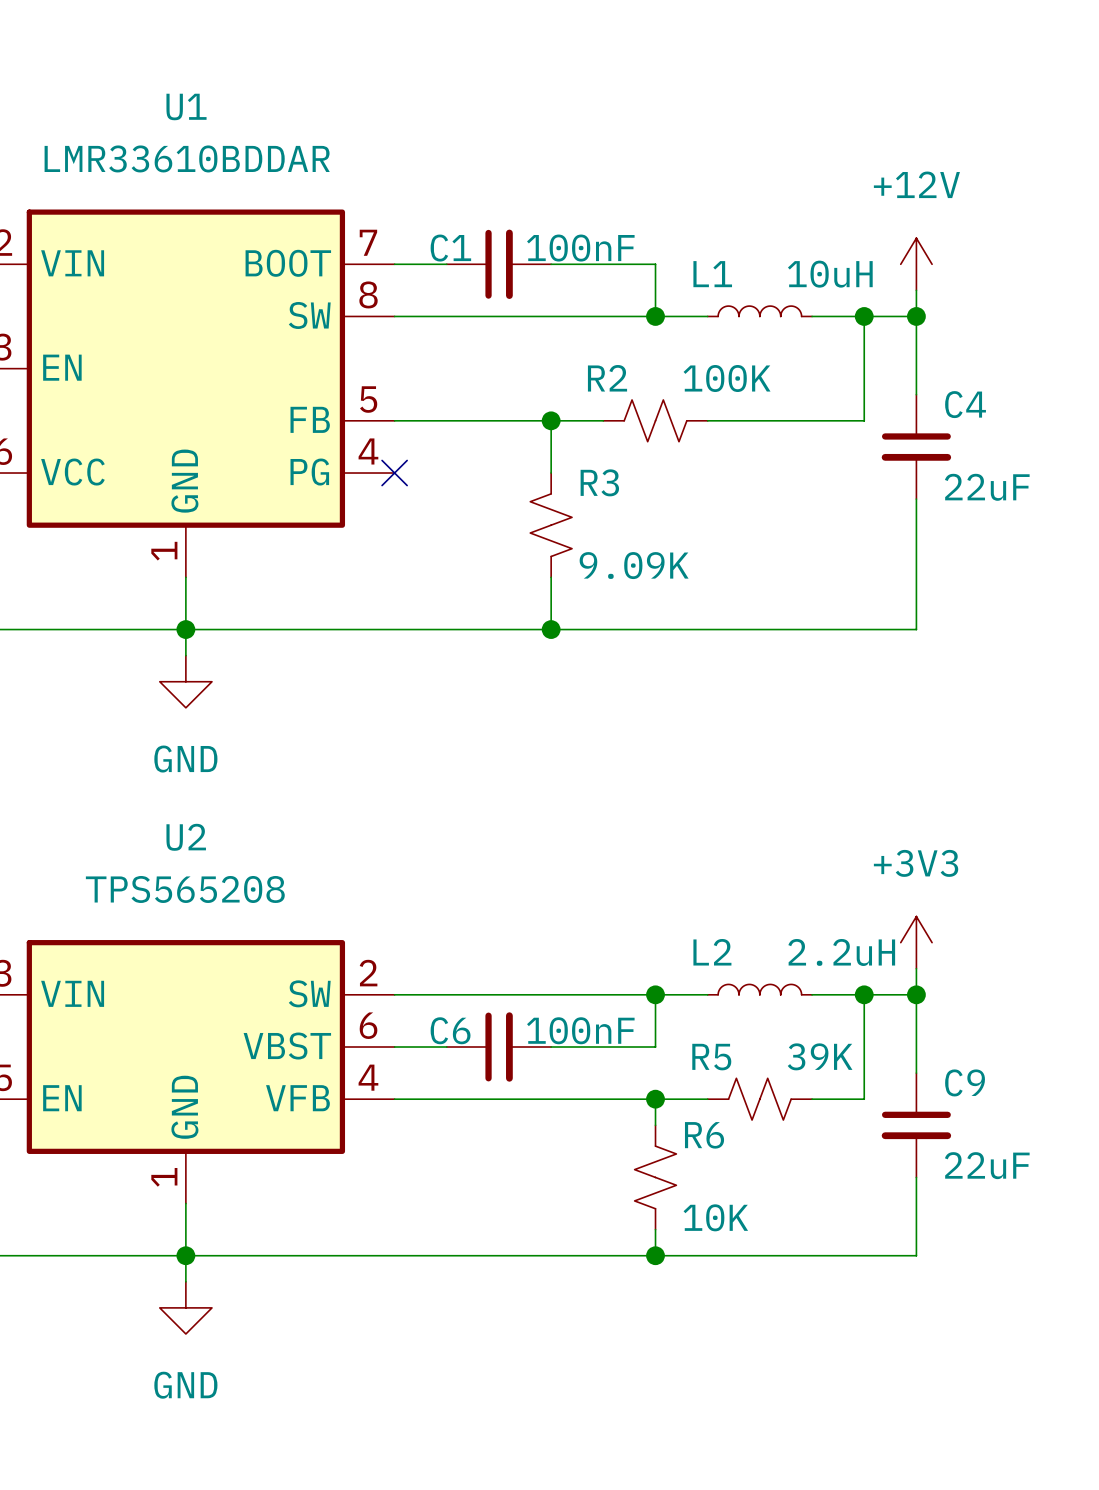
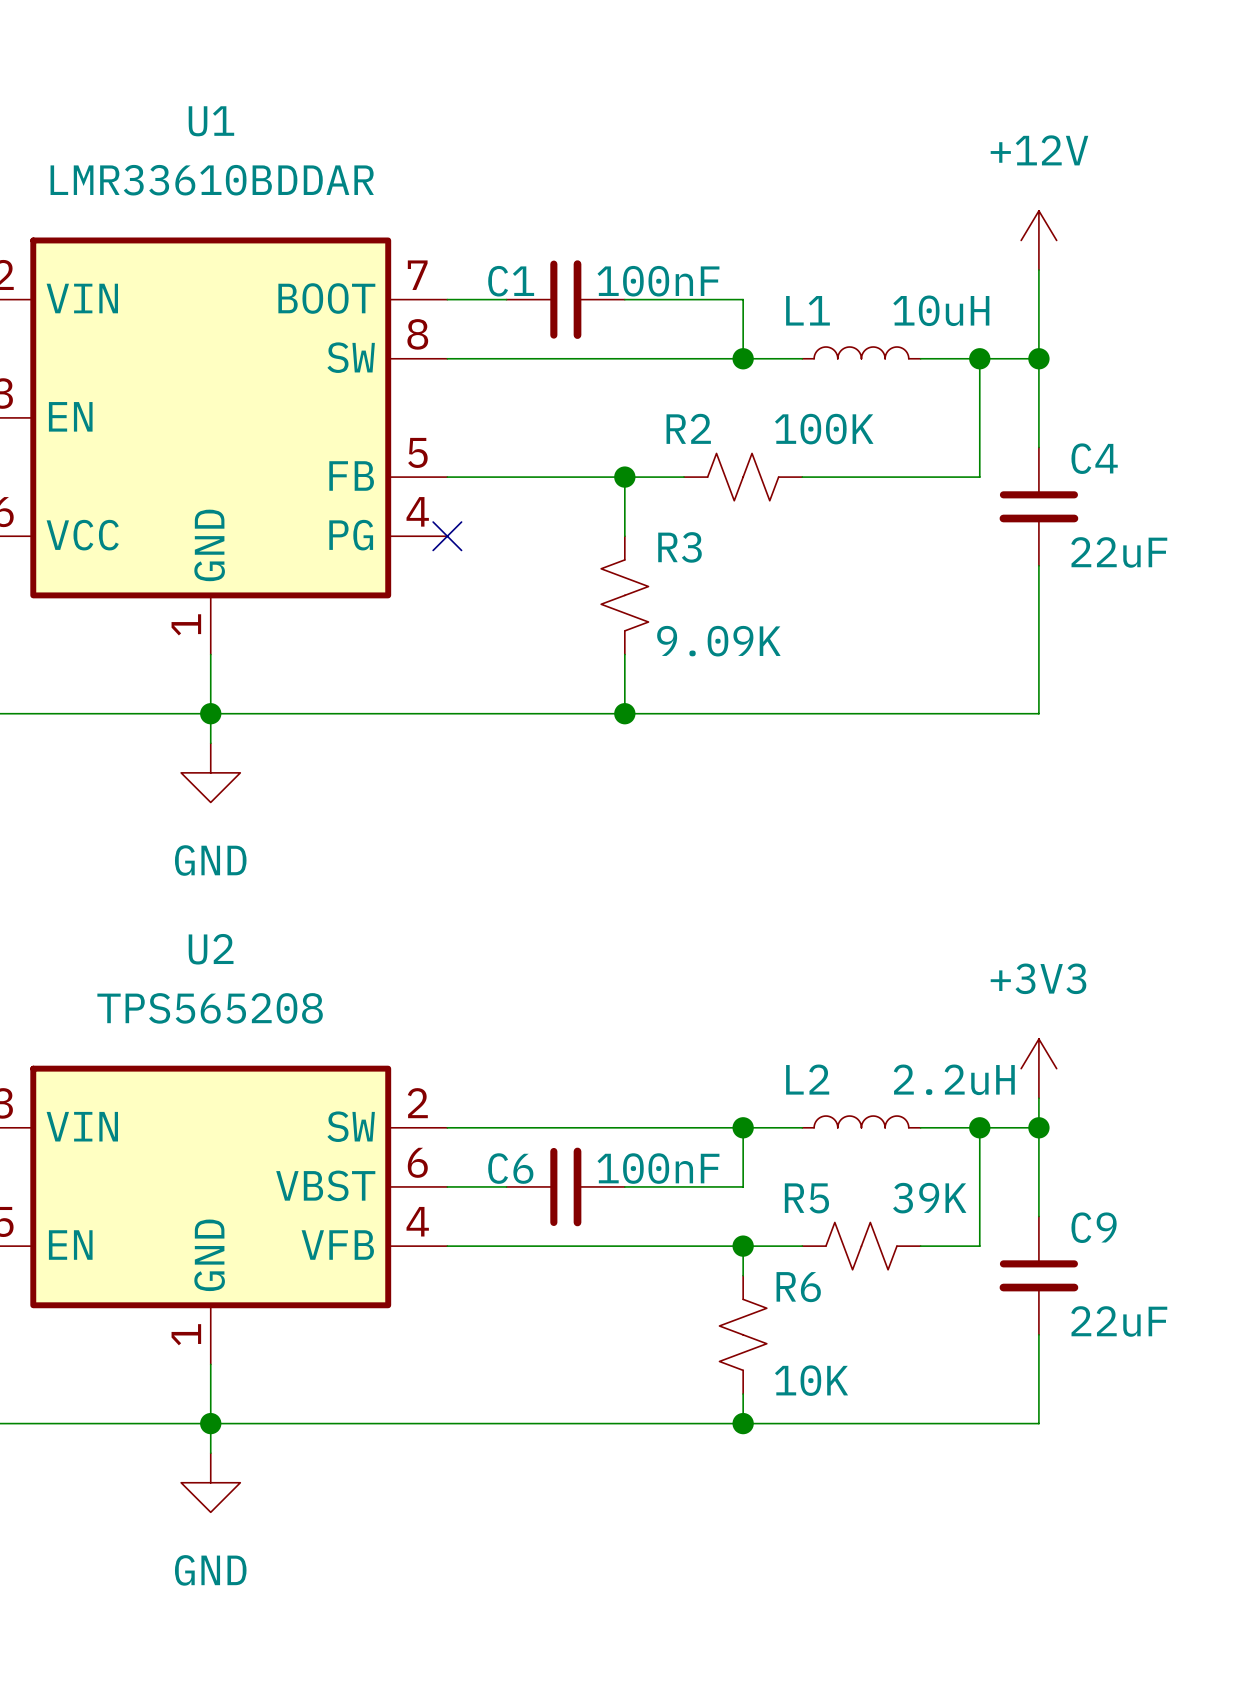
power symbol position: +12V (916, 264) -> +12V (1038, 240)

